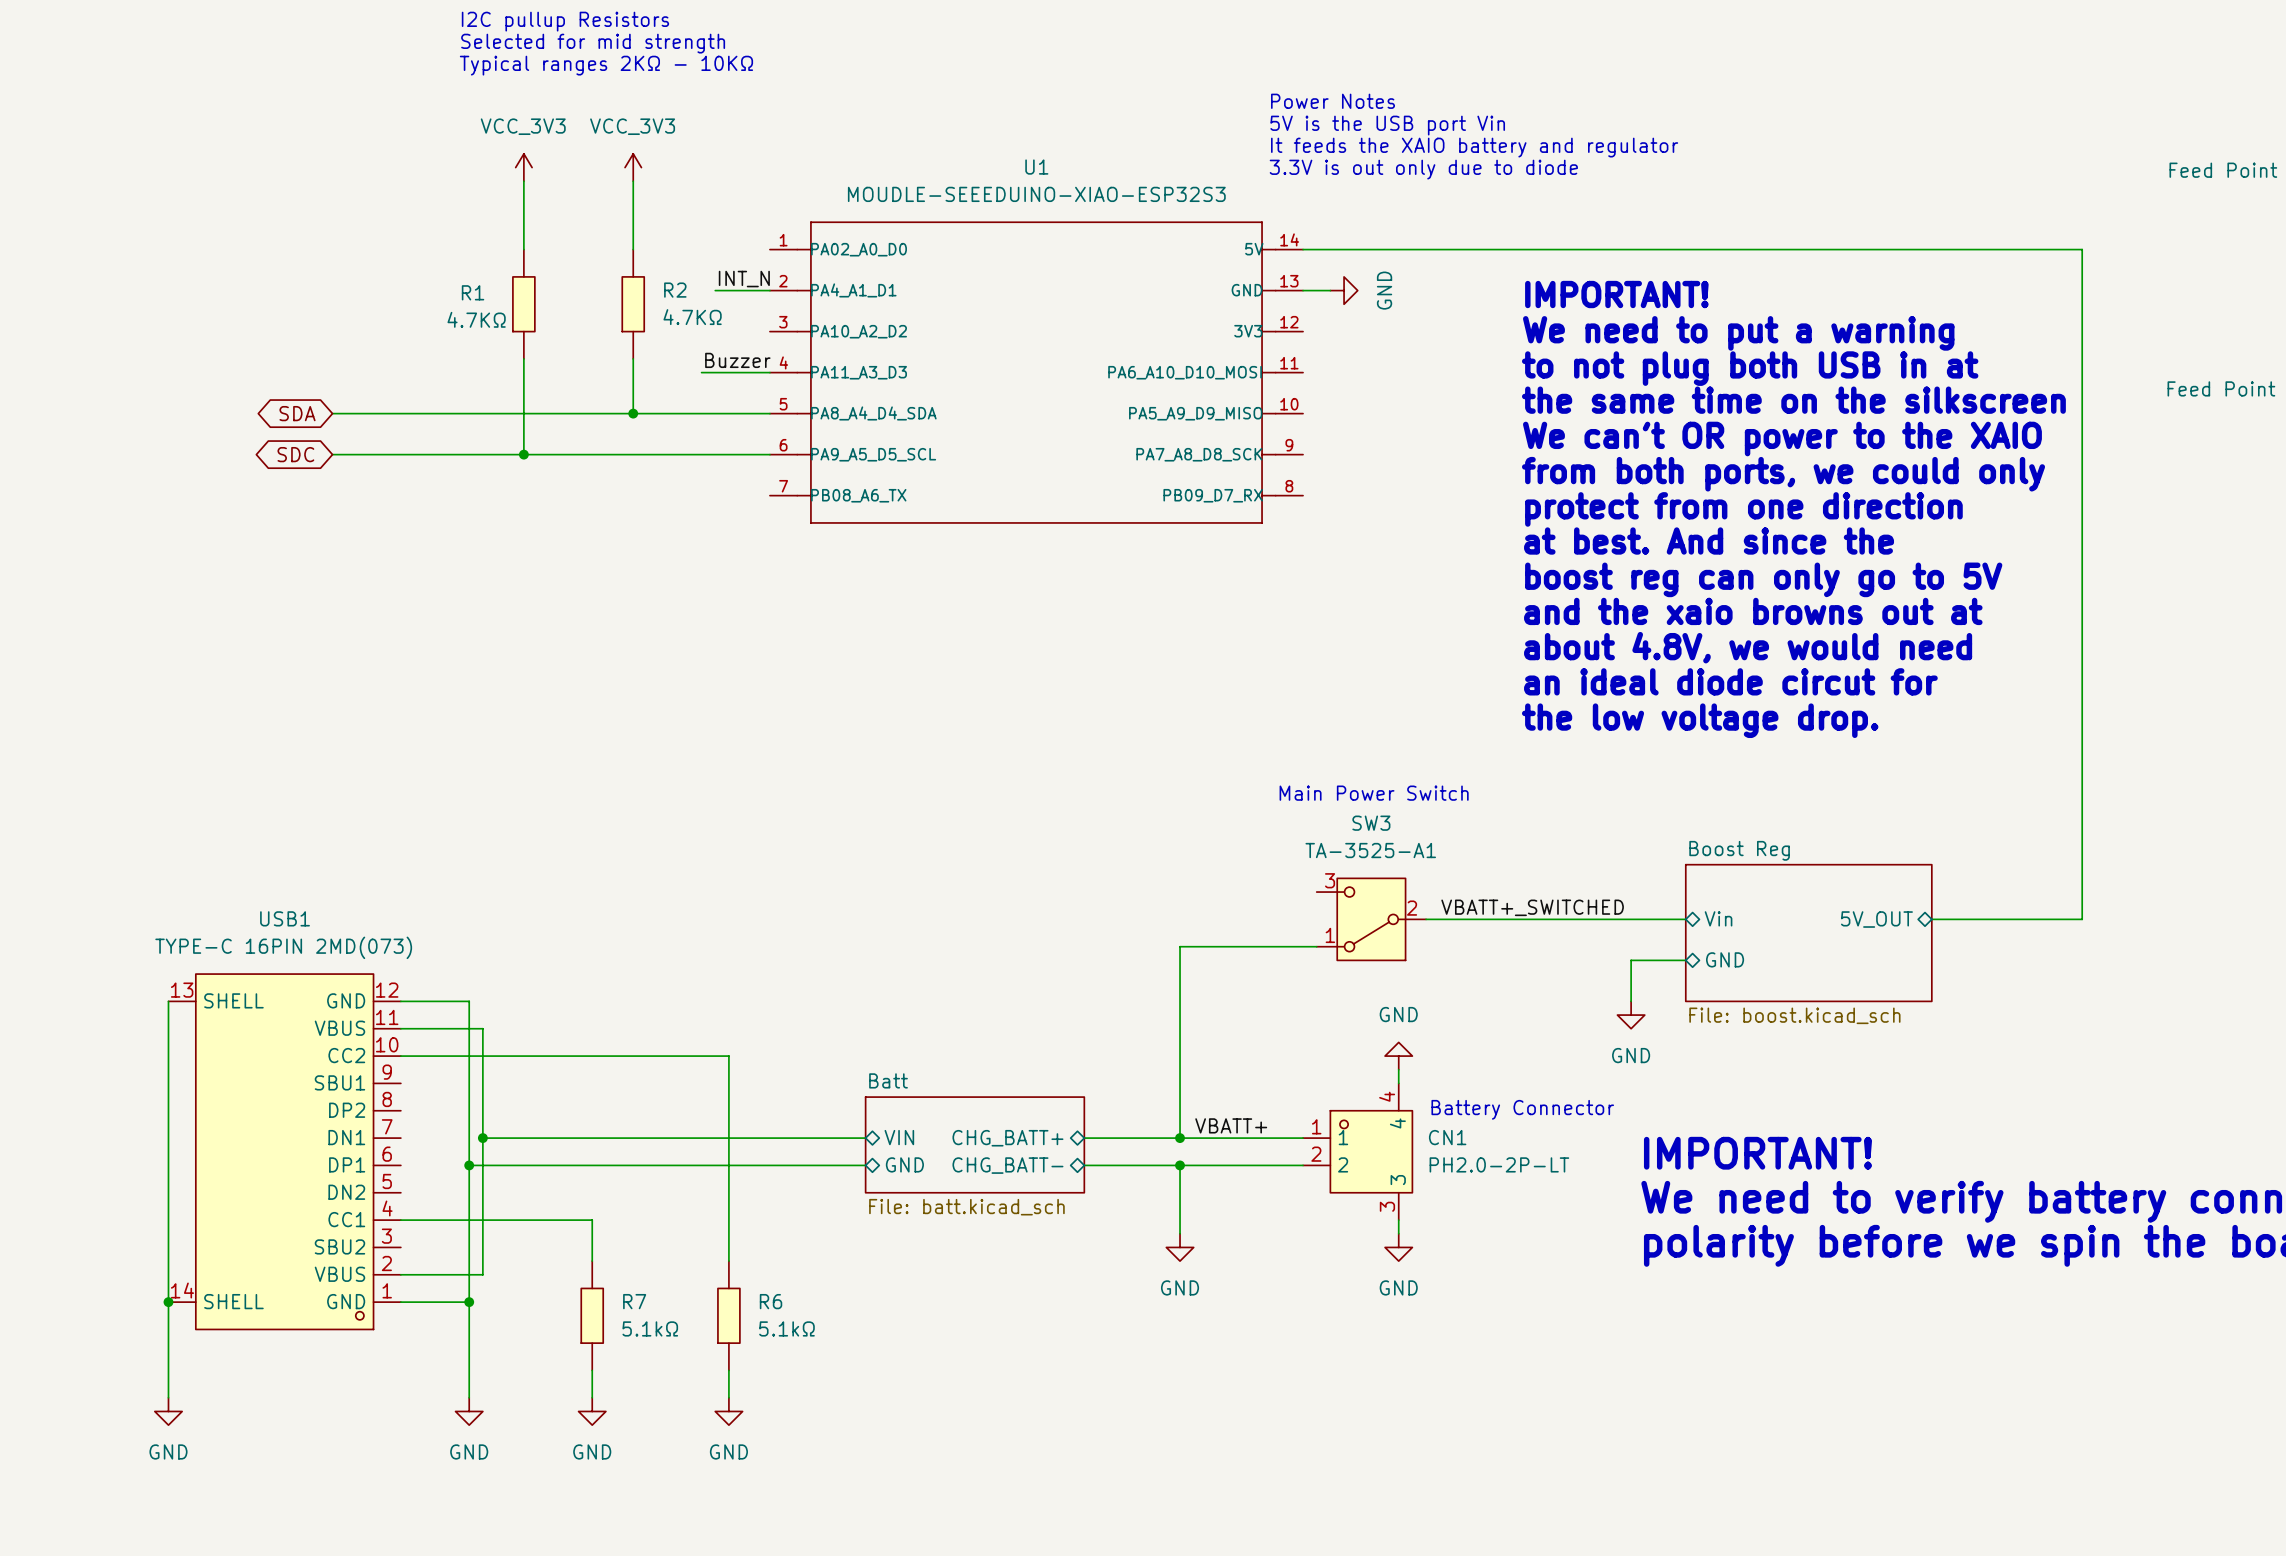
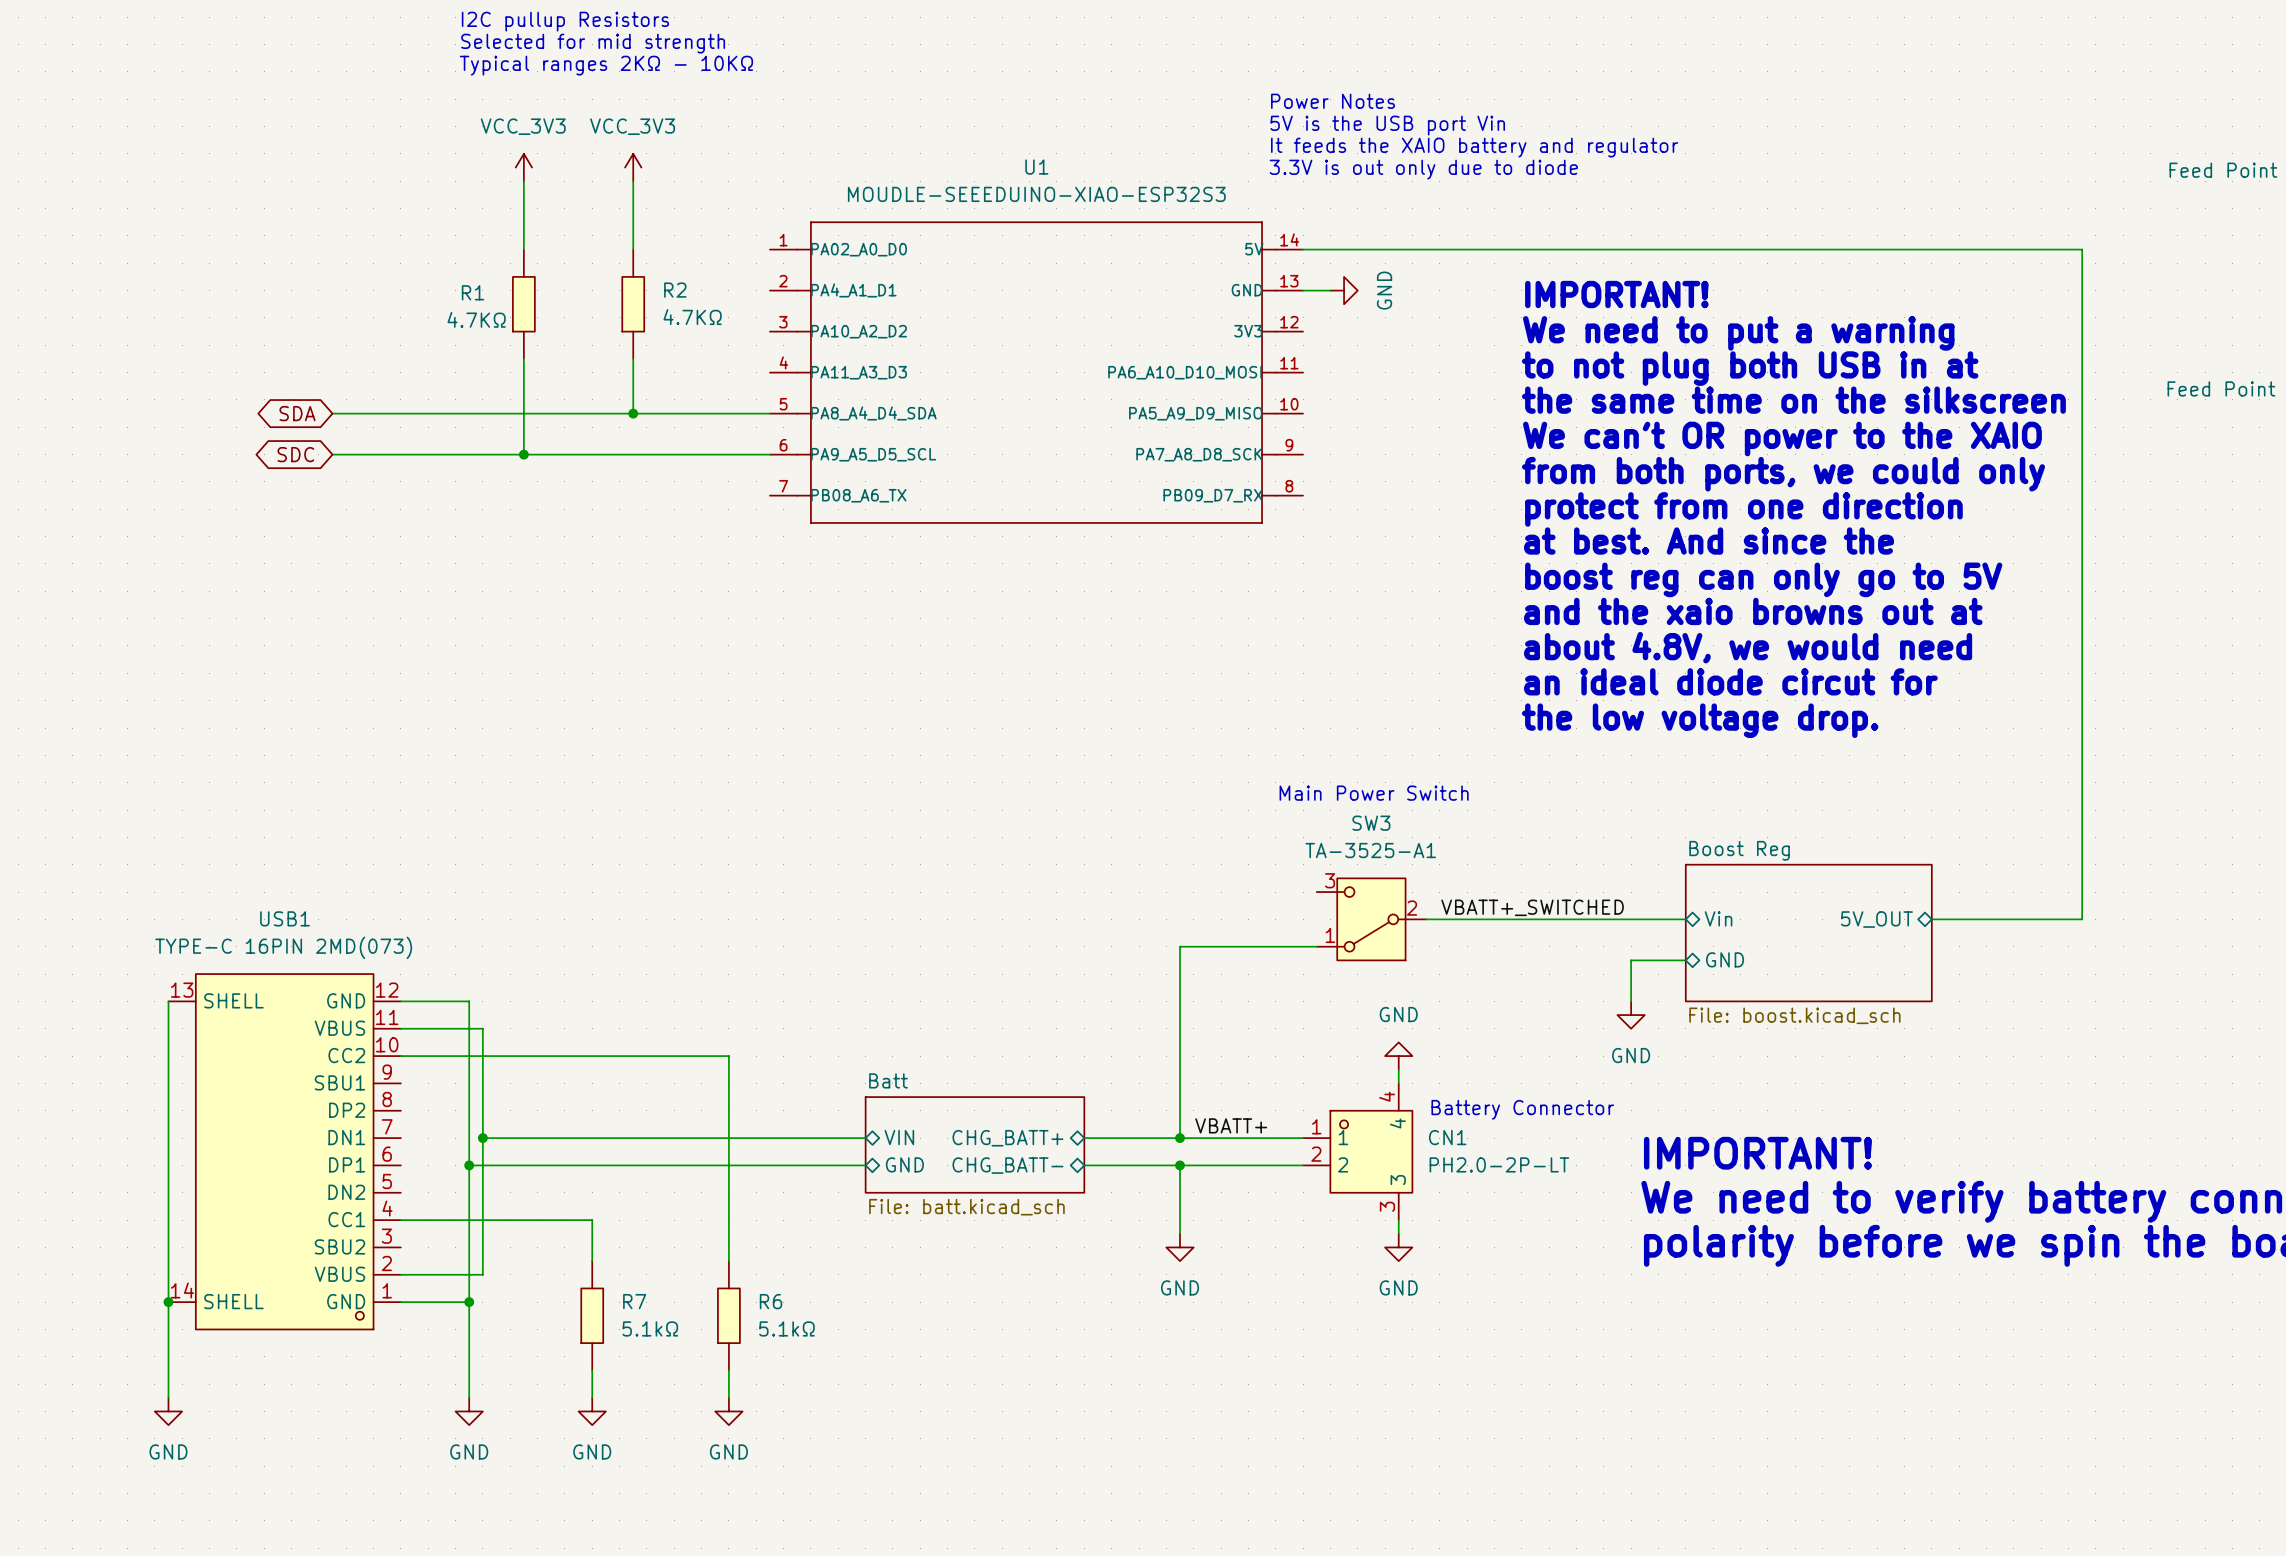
label: INT_N (744, 279) -> none
wire: (715, 290) (769, 290) -> none
label: Buzzer (737, 360) -> none
wire: (701, 372) (769, 372) -> none

